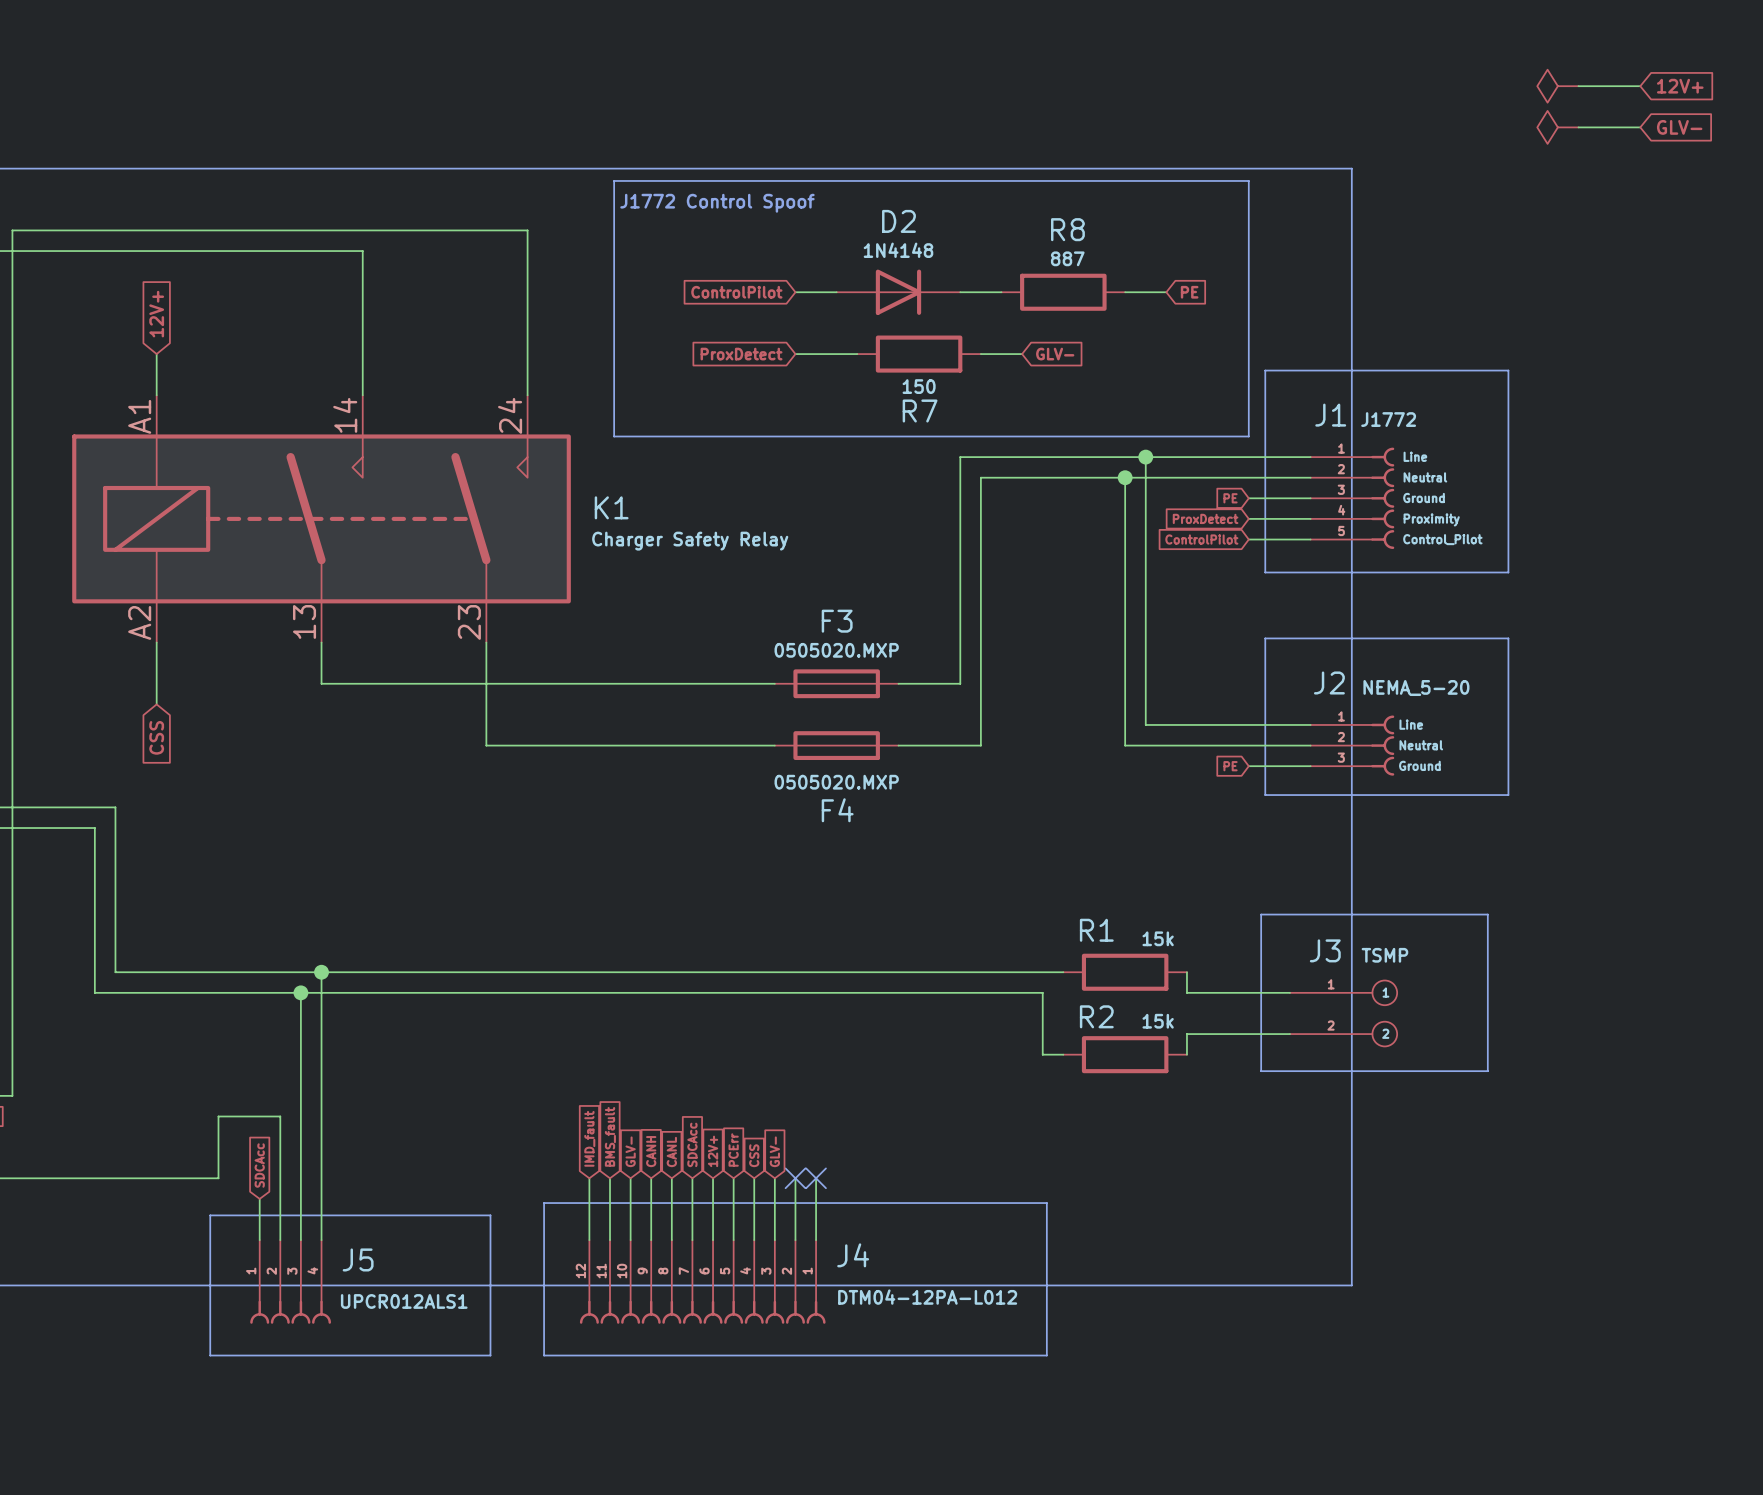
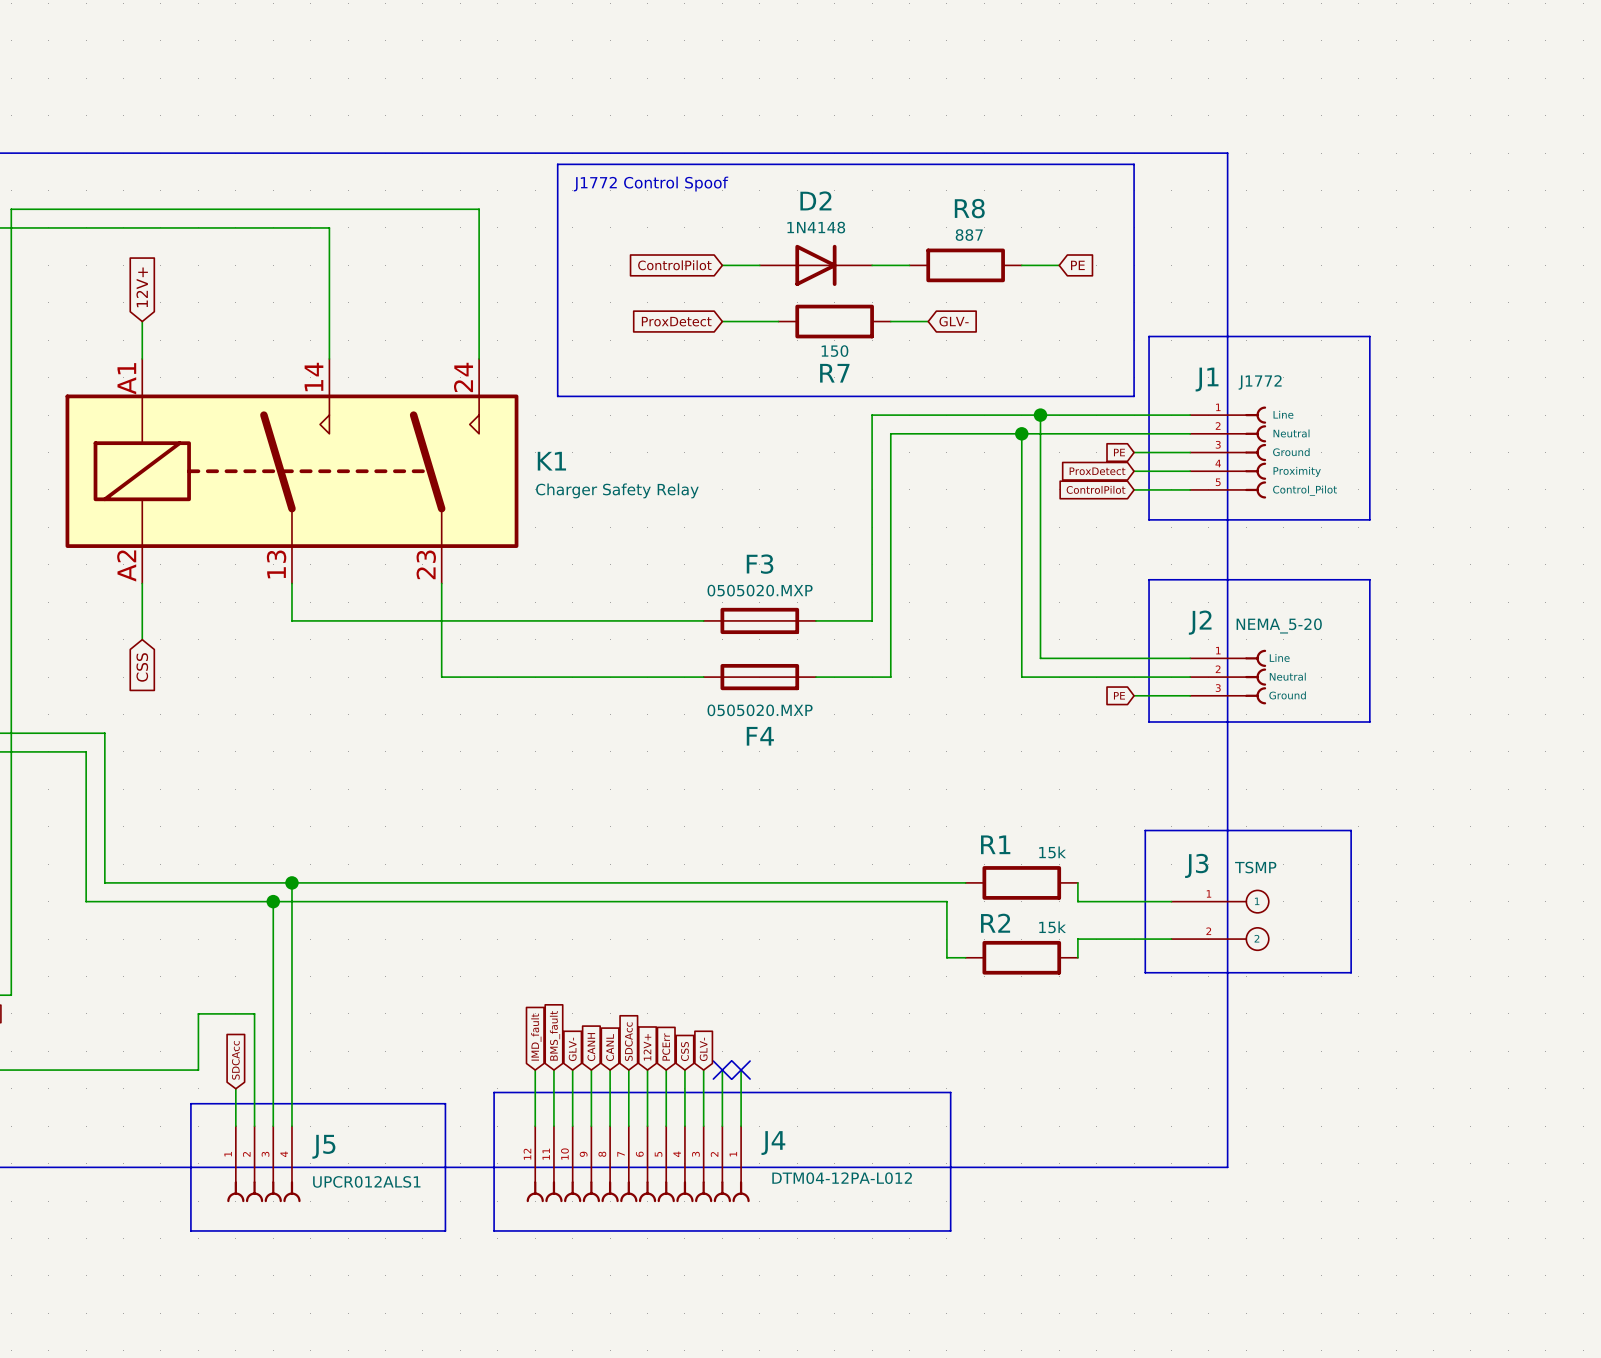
power symbol: (1557, 86) -> none
wire: (1578, 86) (1640, 86) -> none
global label: 12V+ (1680, 86) -> none
power symbol: (1557, 127) -> none
wire: (1578, 127) (1640, 127) -> none
global label: GLV- (1679, 127) -> none

